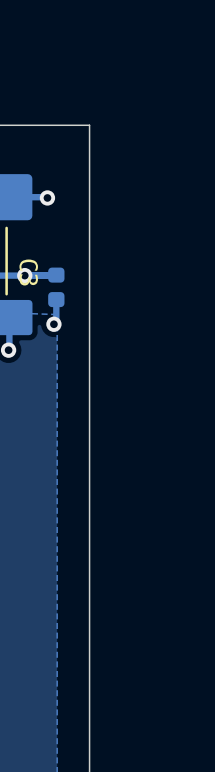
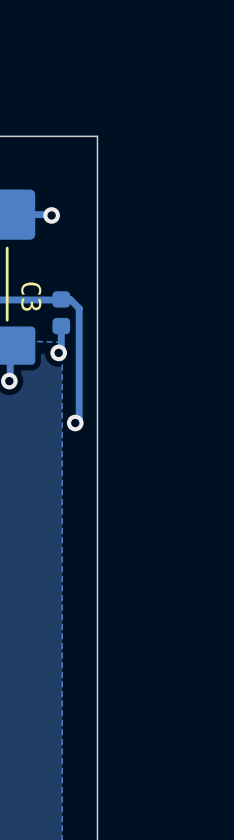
via position: (24, 275) -> (75, 423)
track: none -> (61, 299) (70, 299) (79, 308) (79, 419) (75, 423)

